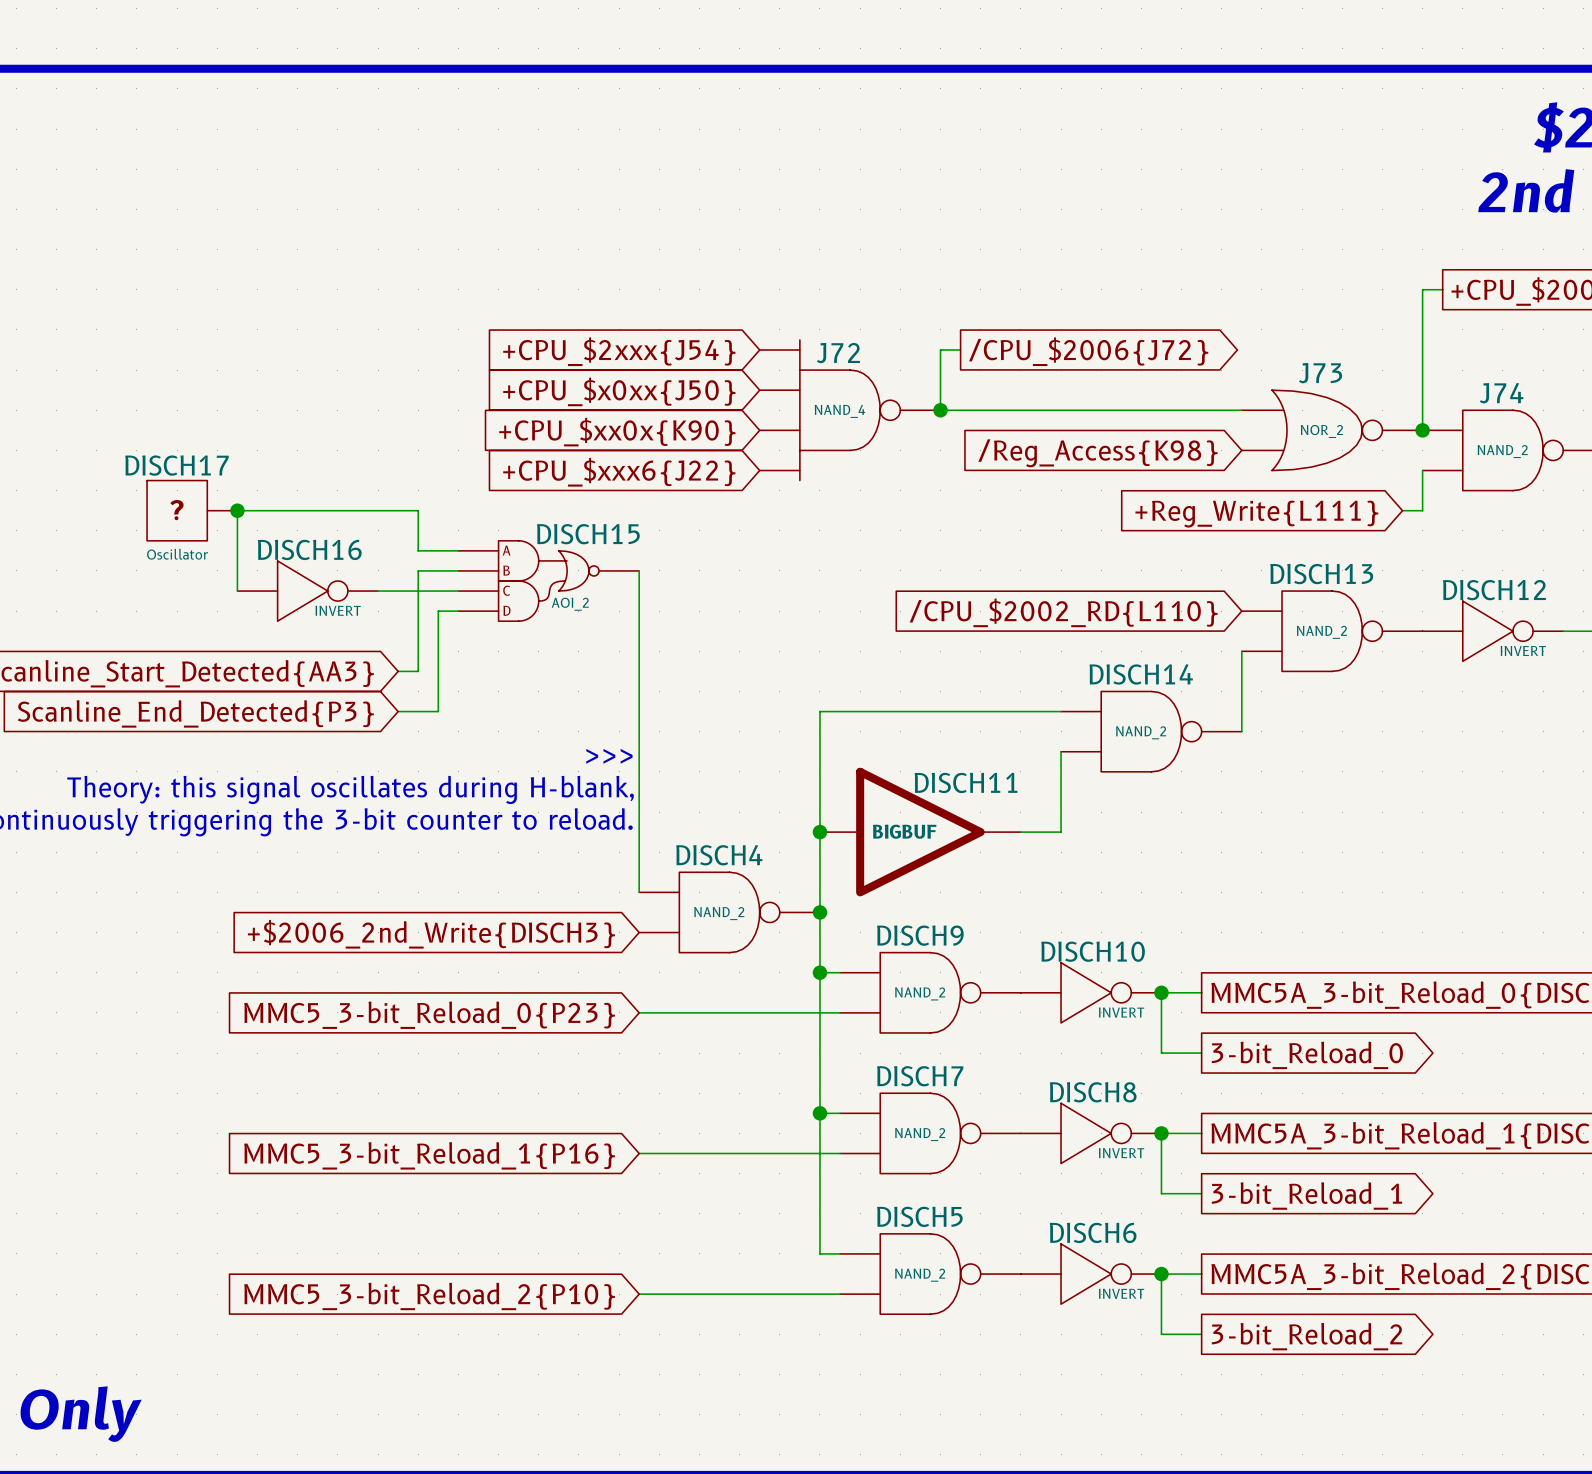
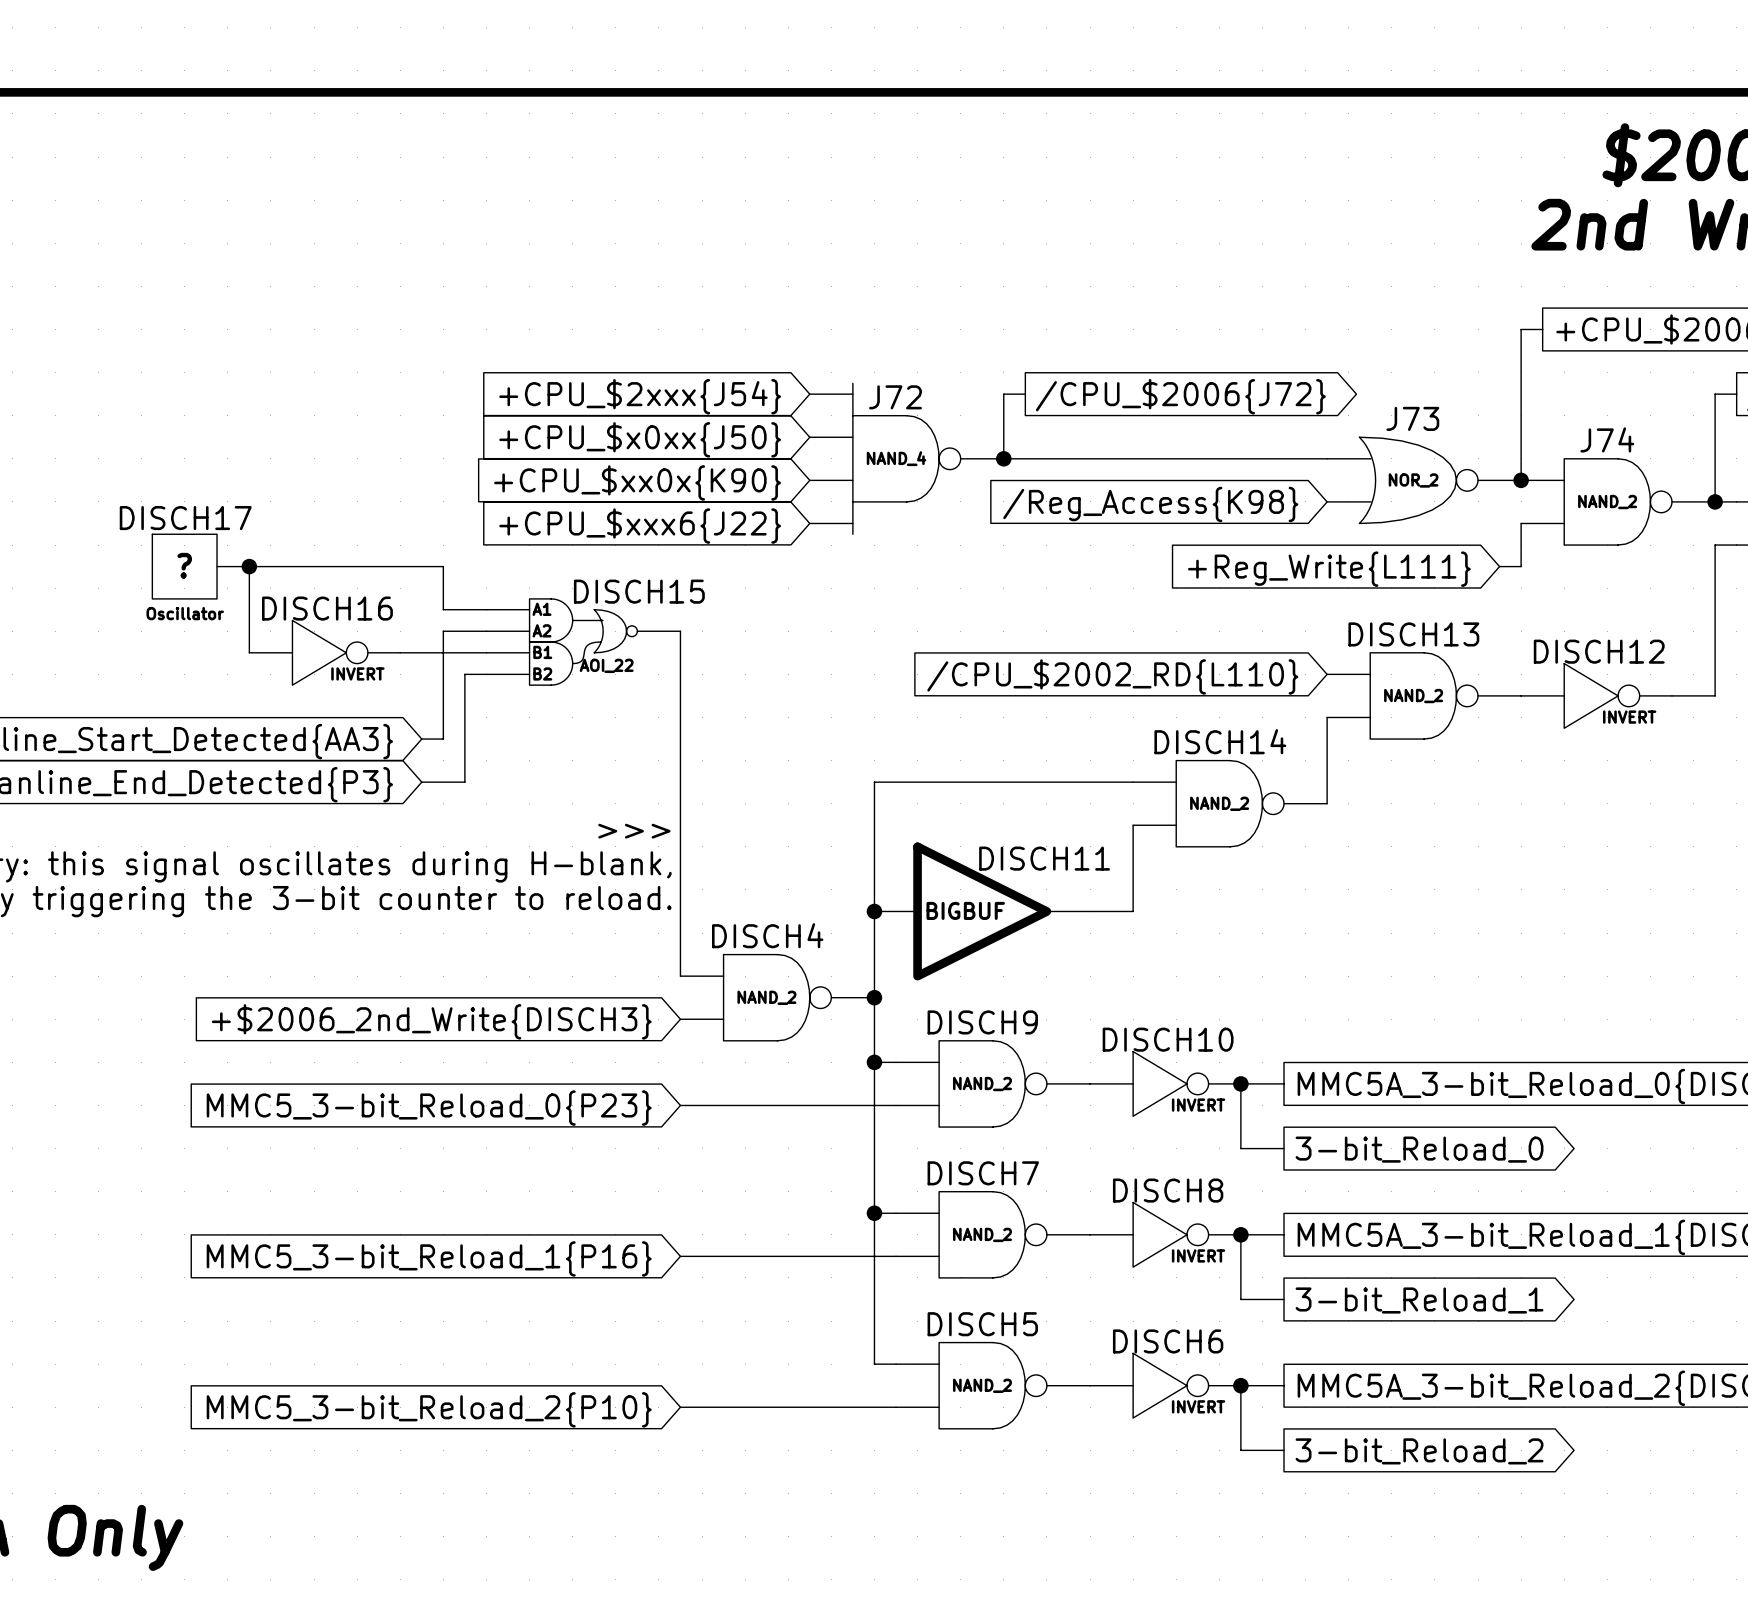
DISCH15 text: A (506, 550) -> none
DISCH15 text: none -> A1 (541, 609)
DISCH15 text: B (506, 570) -> none
DISCH15 text: none -> A2 (541, 630)
DISCH15 text: C (506, 590) -> none
DISCH15 text: none -> B1 (542, 652)
DISCH15 value: AOI_2 (570, 604) -> AOI_22 (606, 665)
DISCH15 text: D (506, 610) -> none
DISCH15 text: none -> B2 (542, 673)

